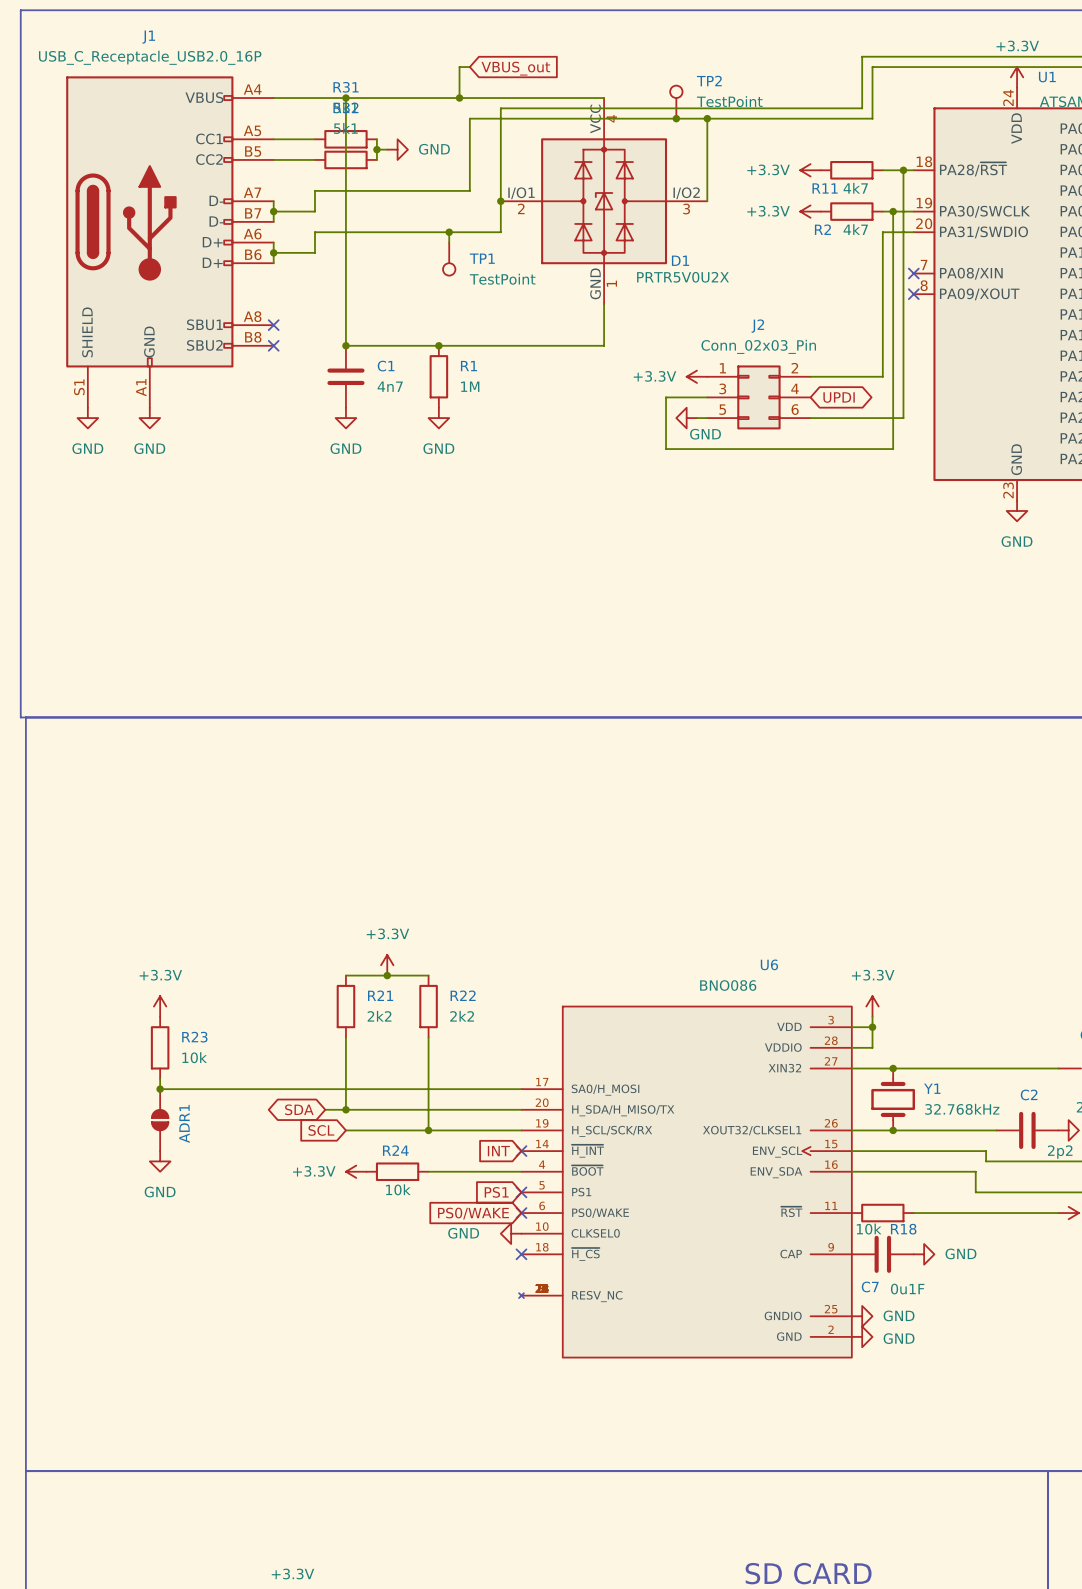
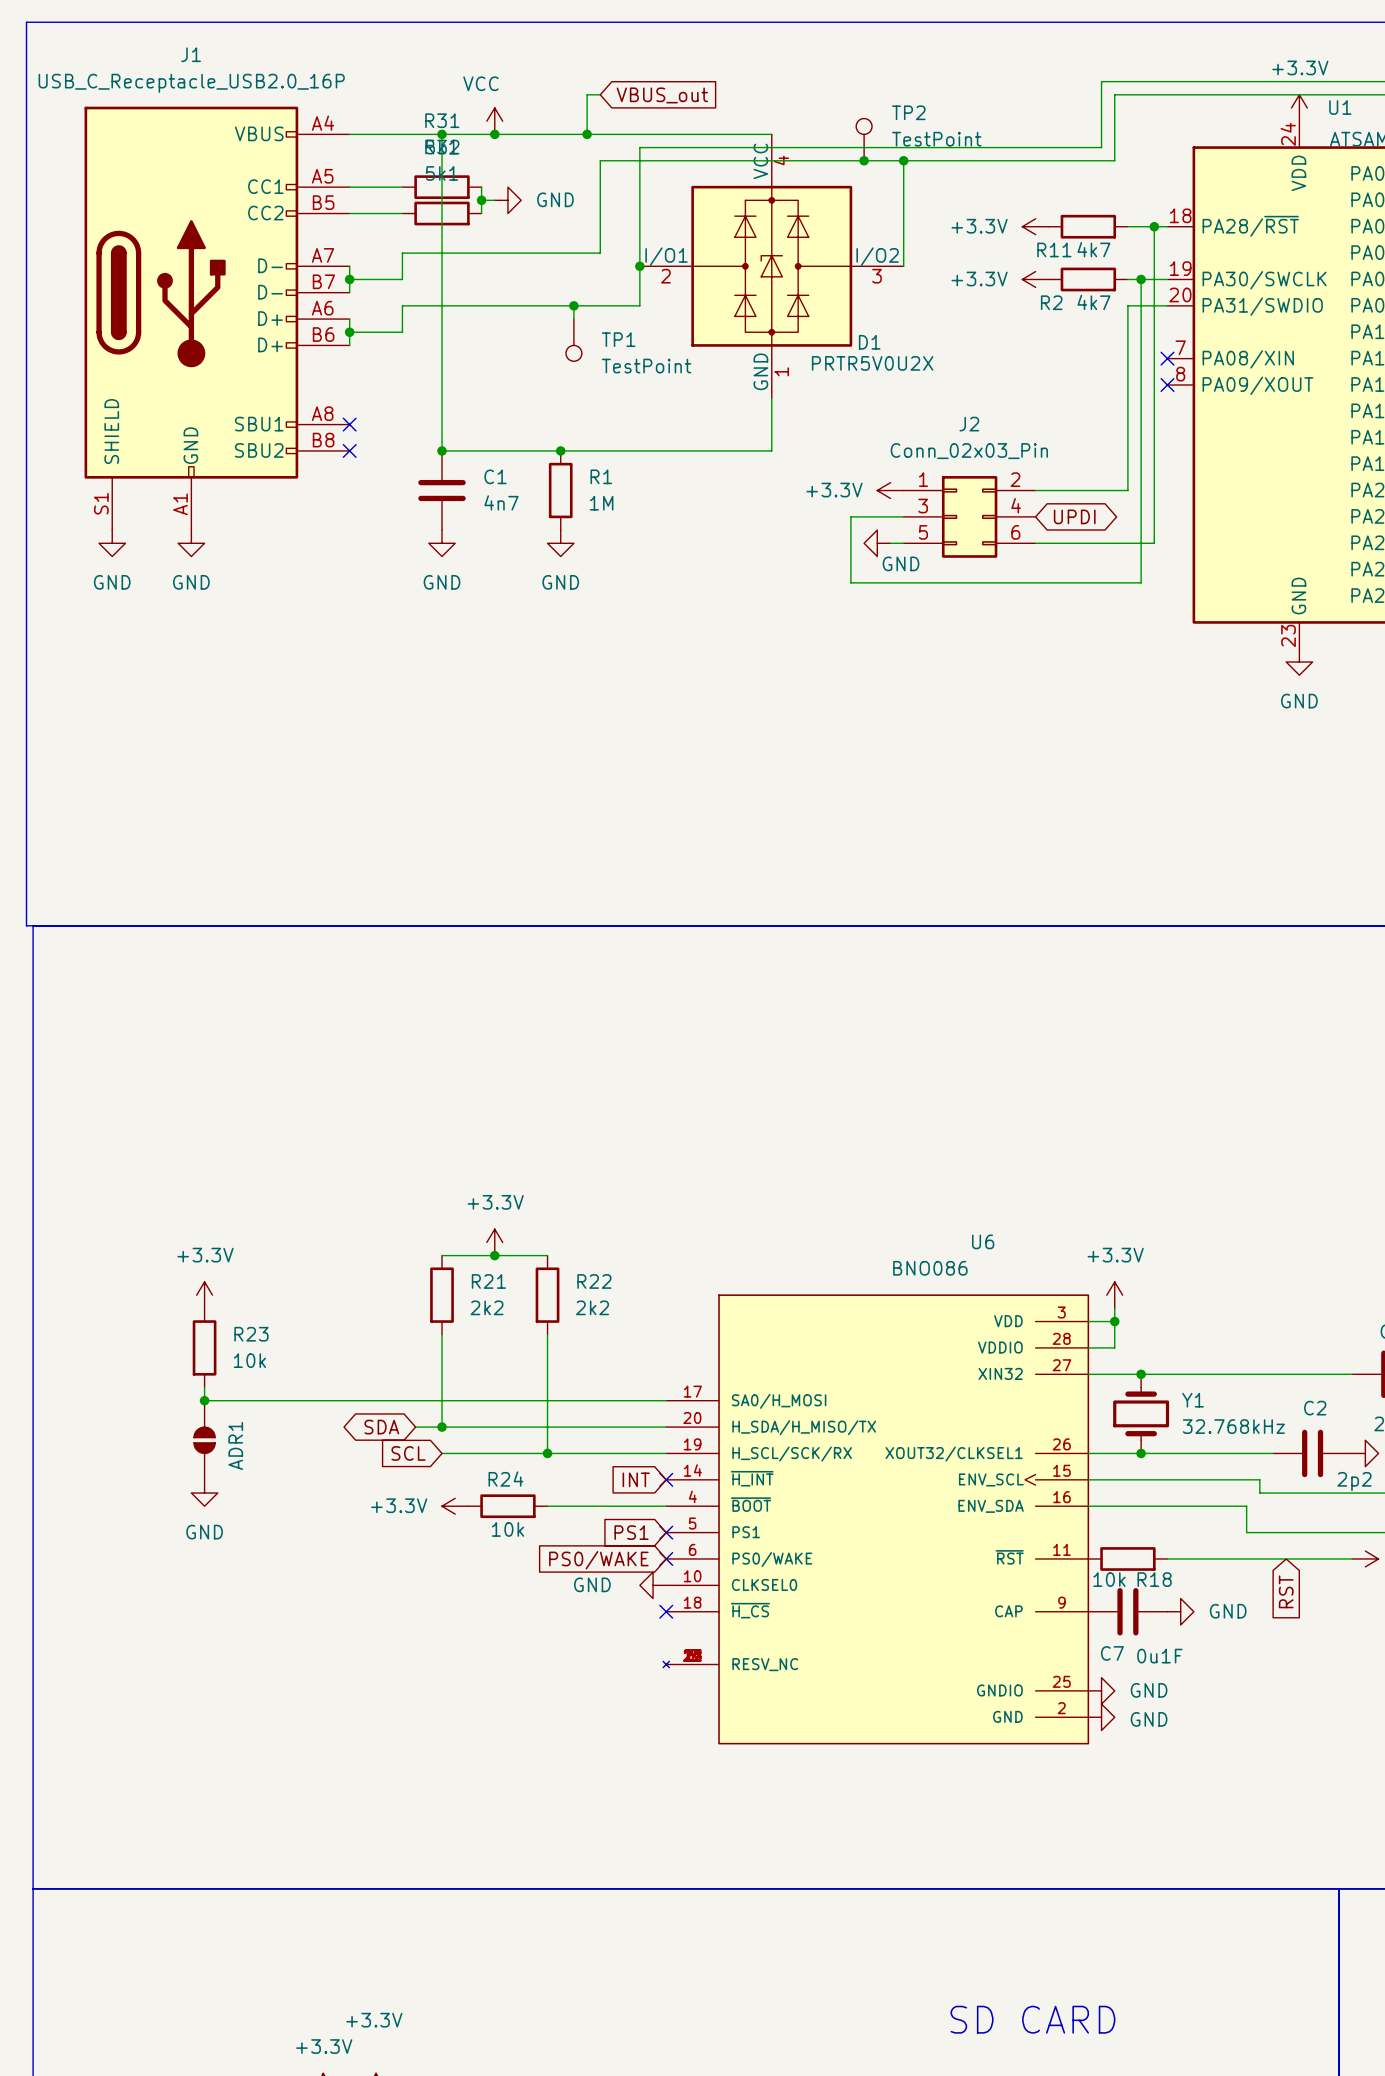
power symbol: none -> VCC (494, 121)
junction: none -> (494, 134)
global label: none -> RST (1286, 1591)

